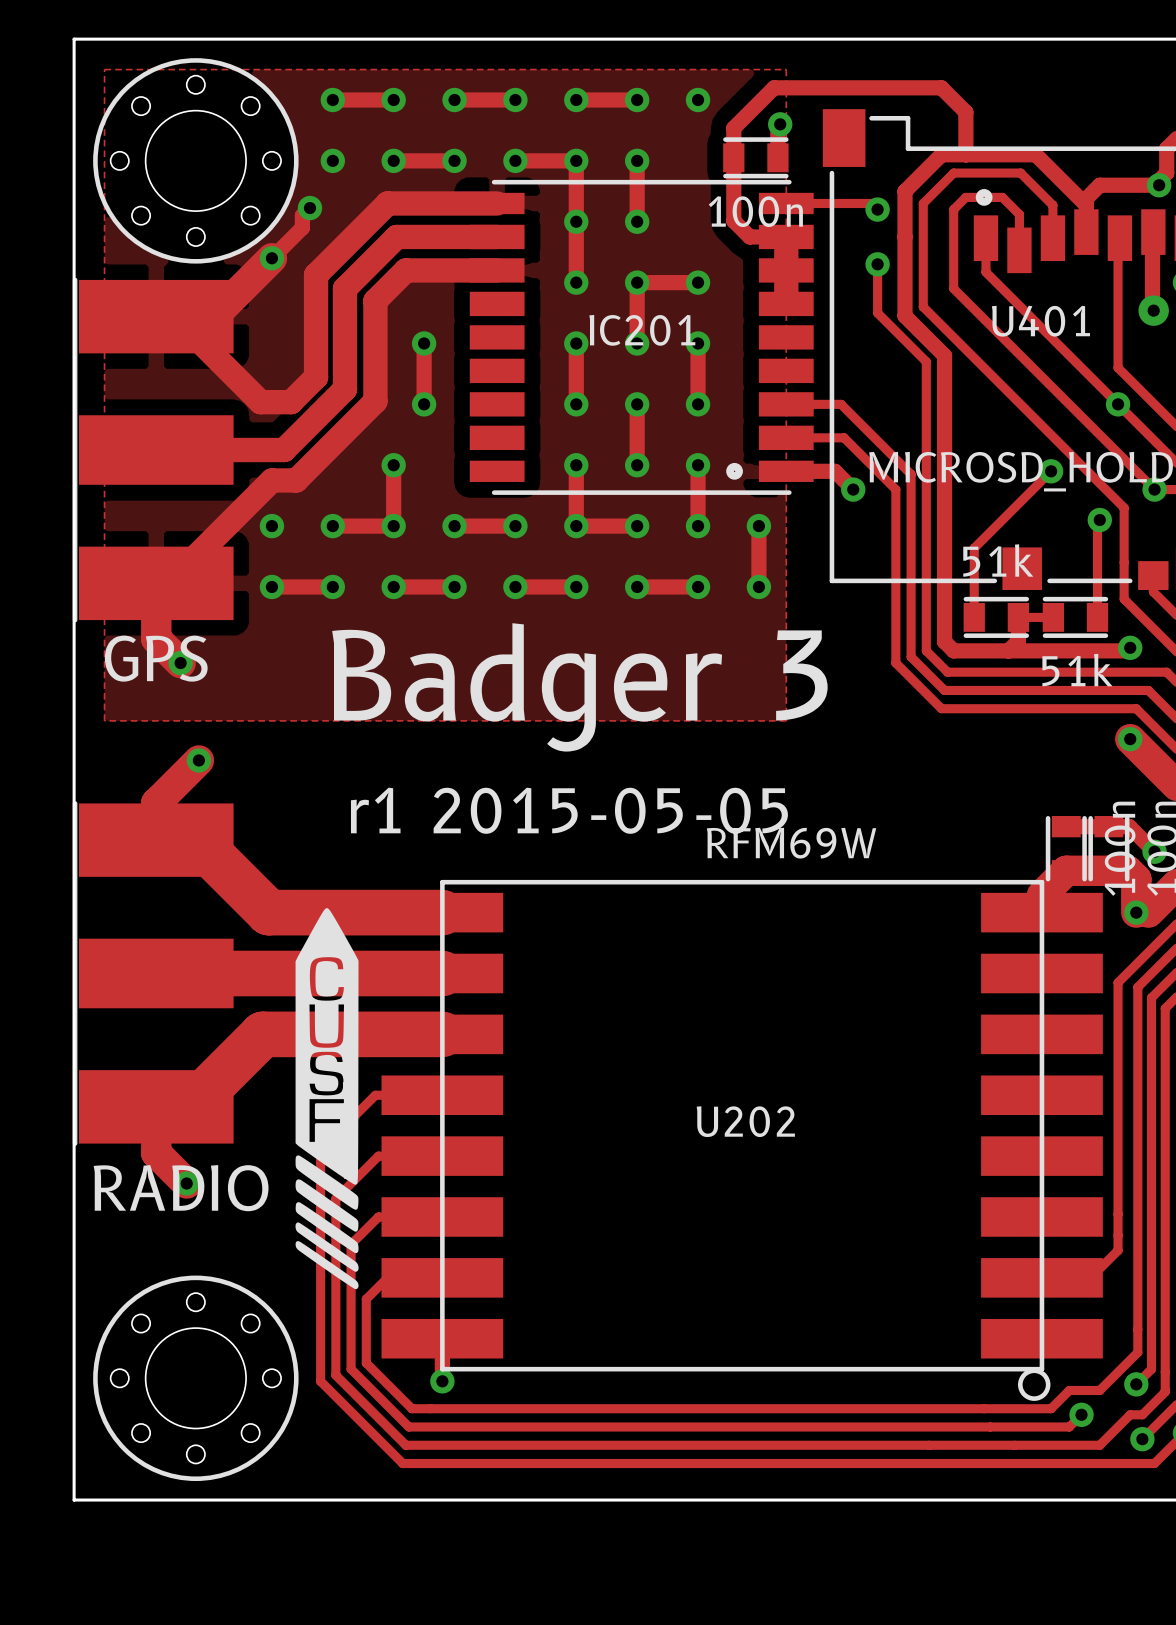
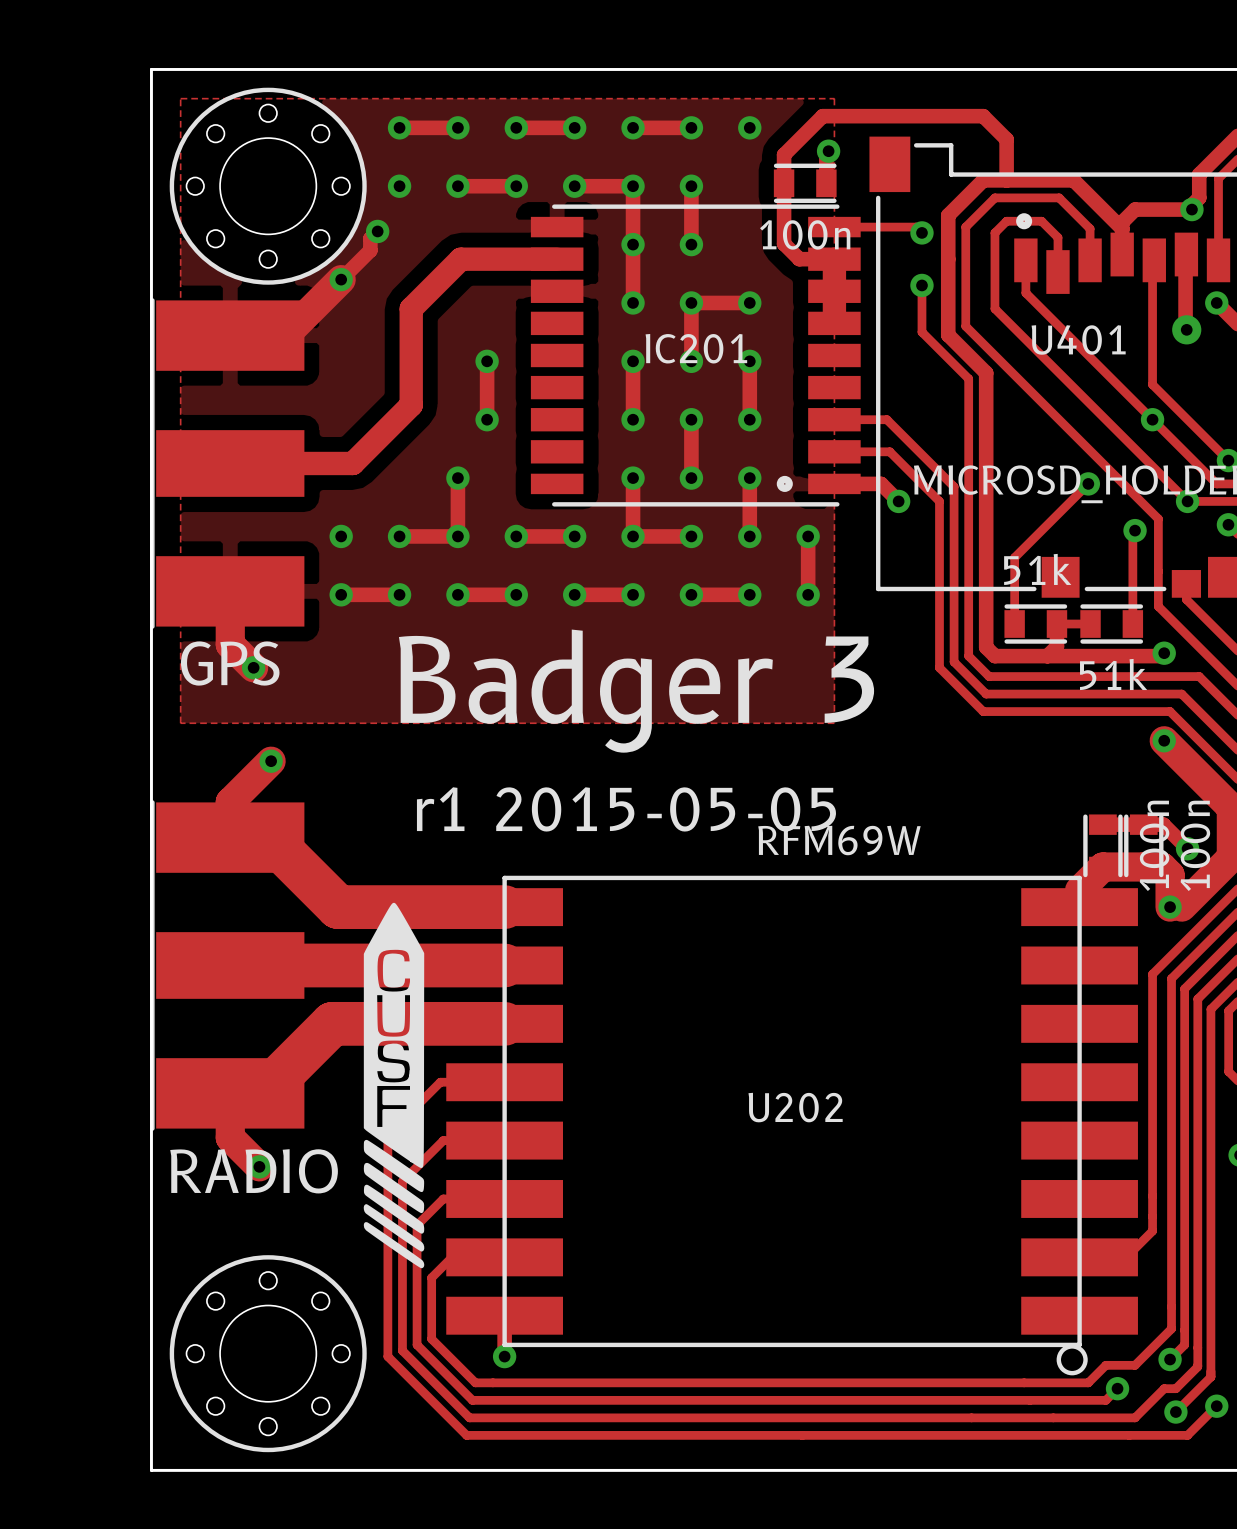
track: (497, 203) (387, 203) (316, 275) (316, 377) (291, 402) (260, 402) (175, 316) -> none
track: (497, 270) (405, 270) (375, 300) (375, 401) (296, 480) (271, 480) (169, 583) -> none

